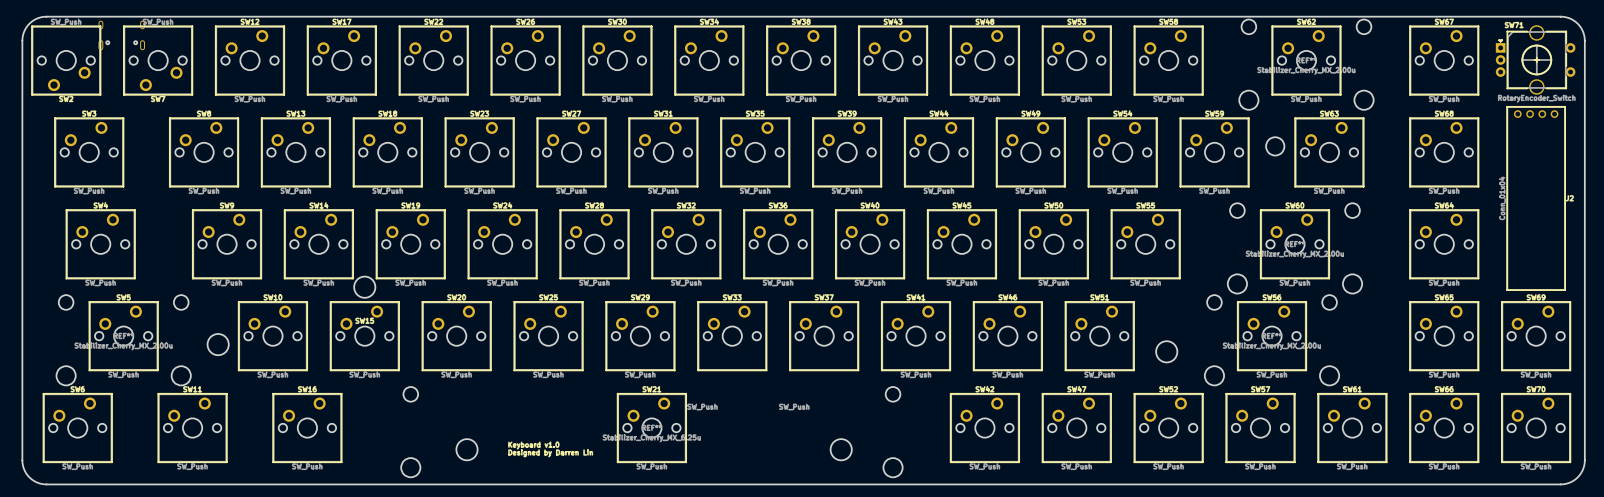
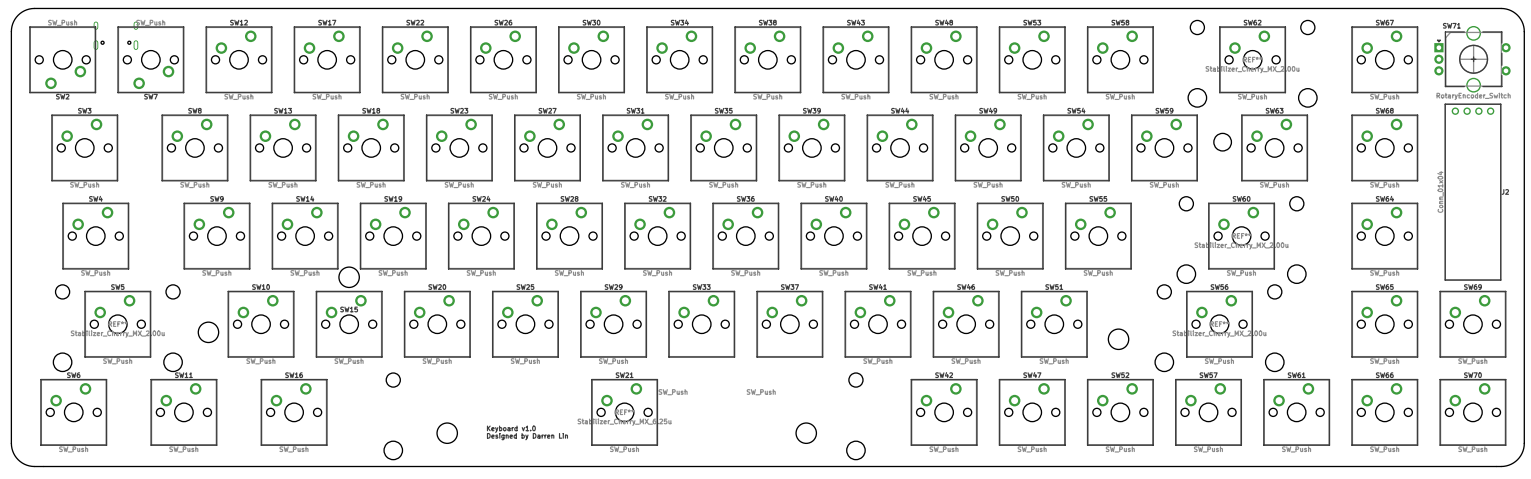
board edge: (46, 484) (38, 483) (29, 477) (24, 470) (22, 460) (22, 40) (23, 32) (29, 23) (36, 19) (46, 16) (1568, 18) (1579, 25) (1584, 40) (1584, 460) (1583, 468) (1577, 477) (1568, 483) (1560, 484) -> (43, 466) (29, 465) (20, 461) (13, 453) (11, 443) (11, 31) (12, 23) (18, 15) (26, 9) (34, 8) (1508, 9) (1519, 17) (1524, 31) (1524, 443) (1522, 453) (1515, 461) (1506, 465) (1496, 466)

